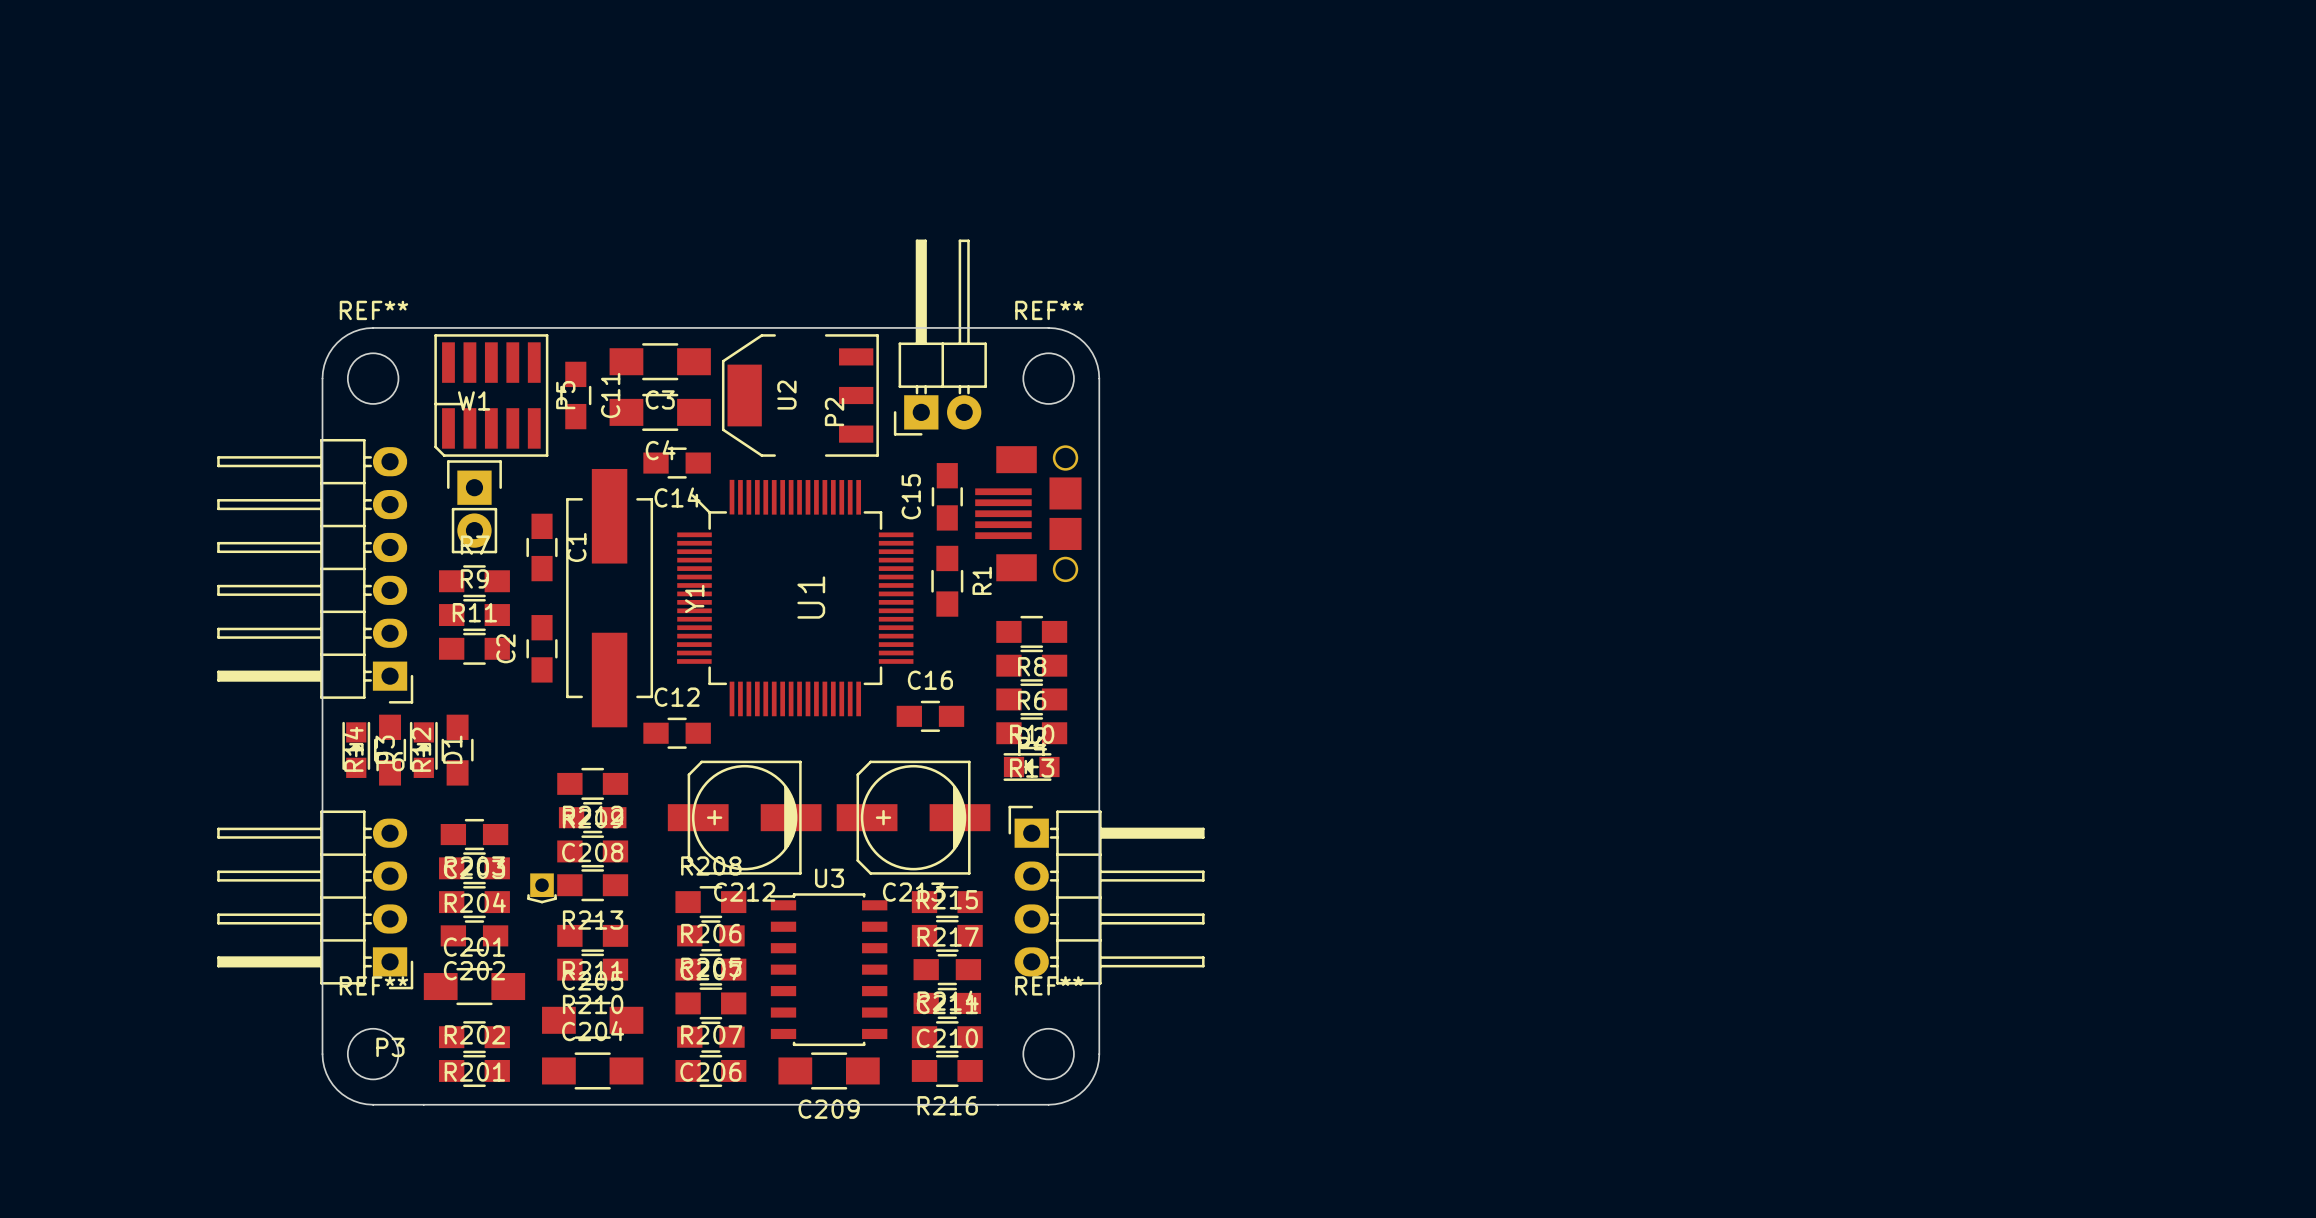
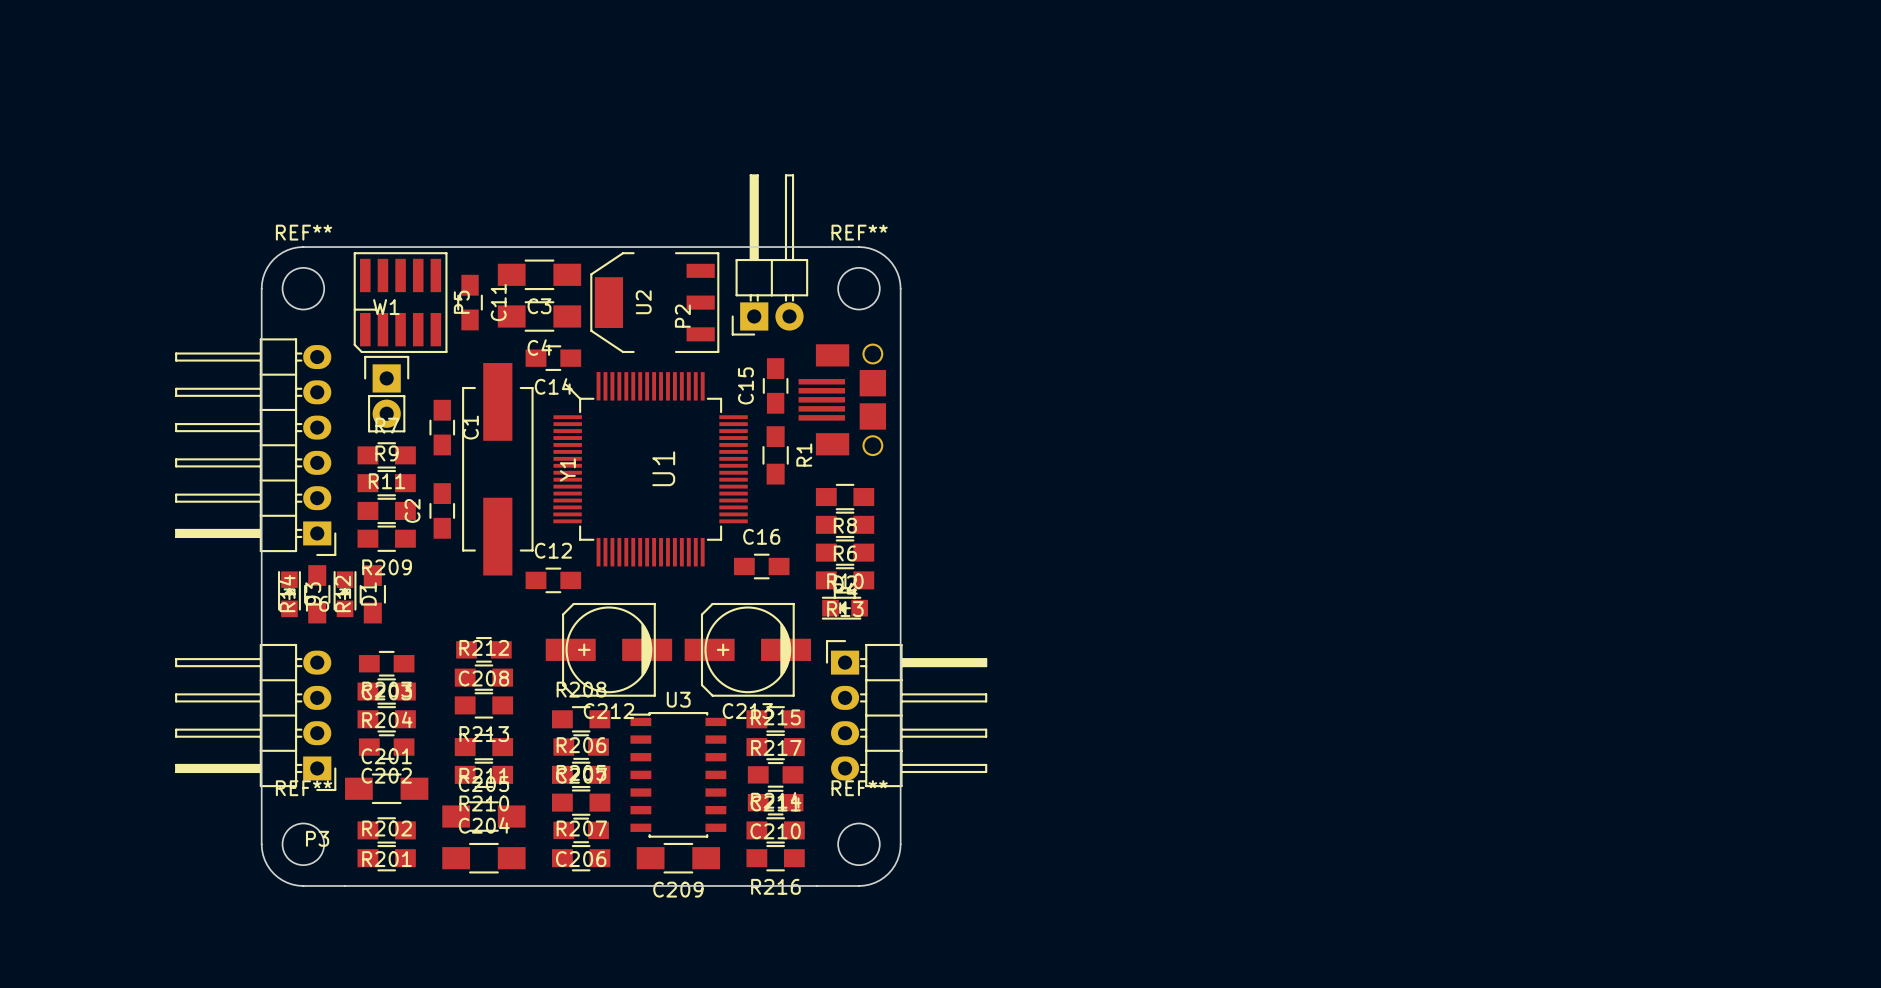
R209 position: (592, 783) -> (386, 538)
part: (542, 888) -> none

